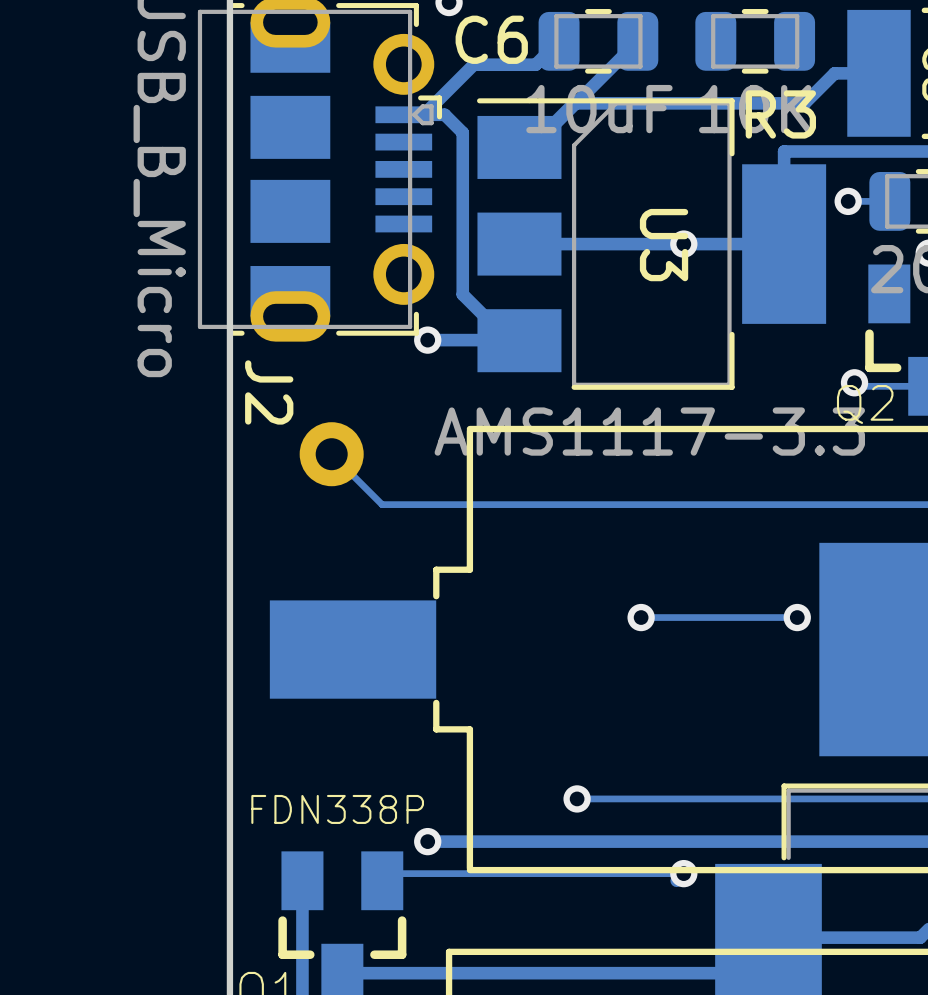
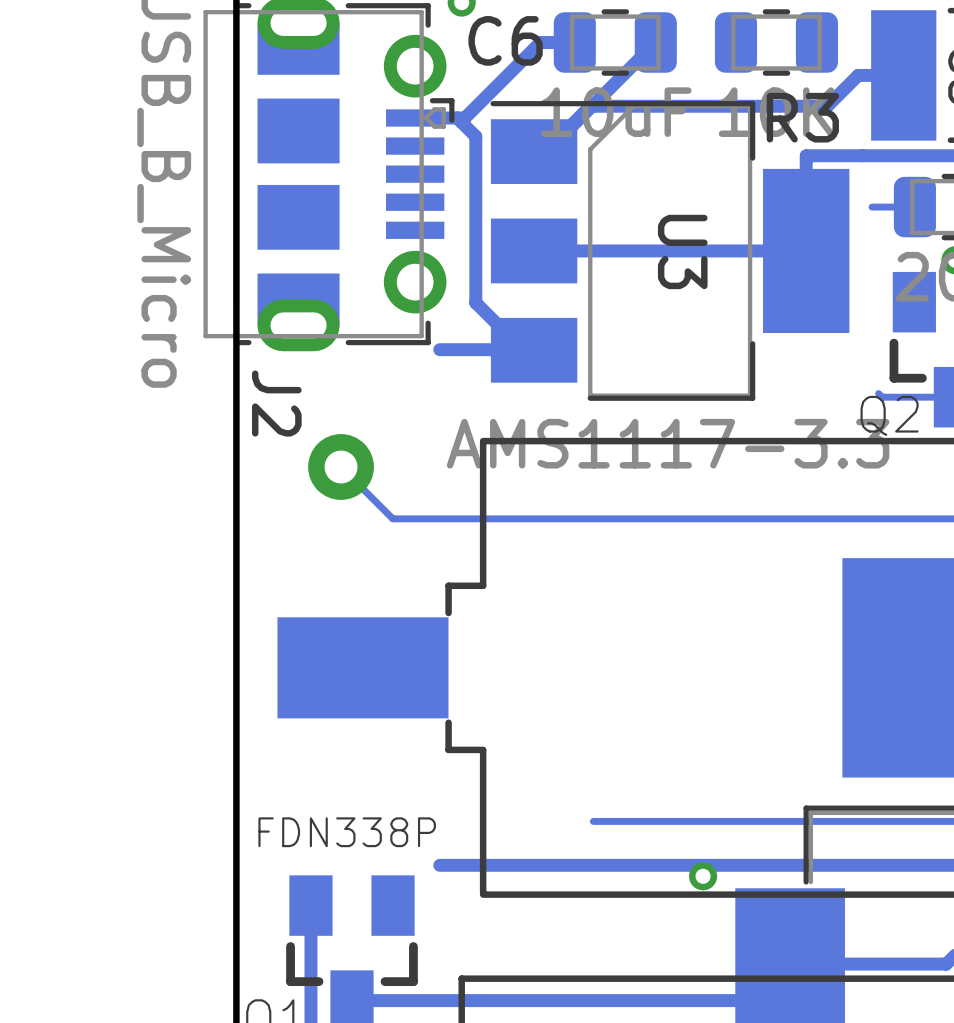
track: (559, 41) (535, 64) (473, 64) (423, 114) -> (574, 42) (540, 42) (464, 118) (457, 118)
via: (848, 201) -> none
via: (683, 244) -> none
via: (427, 340) -> none
via: (854, 382) -> none
via: (641, 617) -> none
track: (797, 617) (641, 617) -> none
via: (797, 617) -> none
via: (577, 798) -> none
via: (427, 841) -> none
via position: (683, 873) -> (703, 876)
track: (676, 880) (683, 873) (389, 873) (382, 880) -> none

